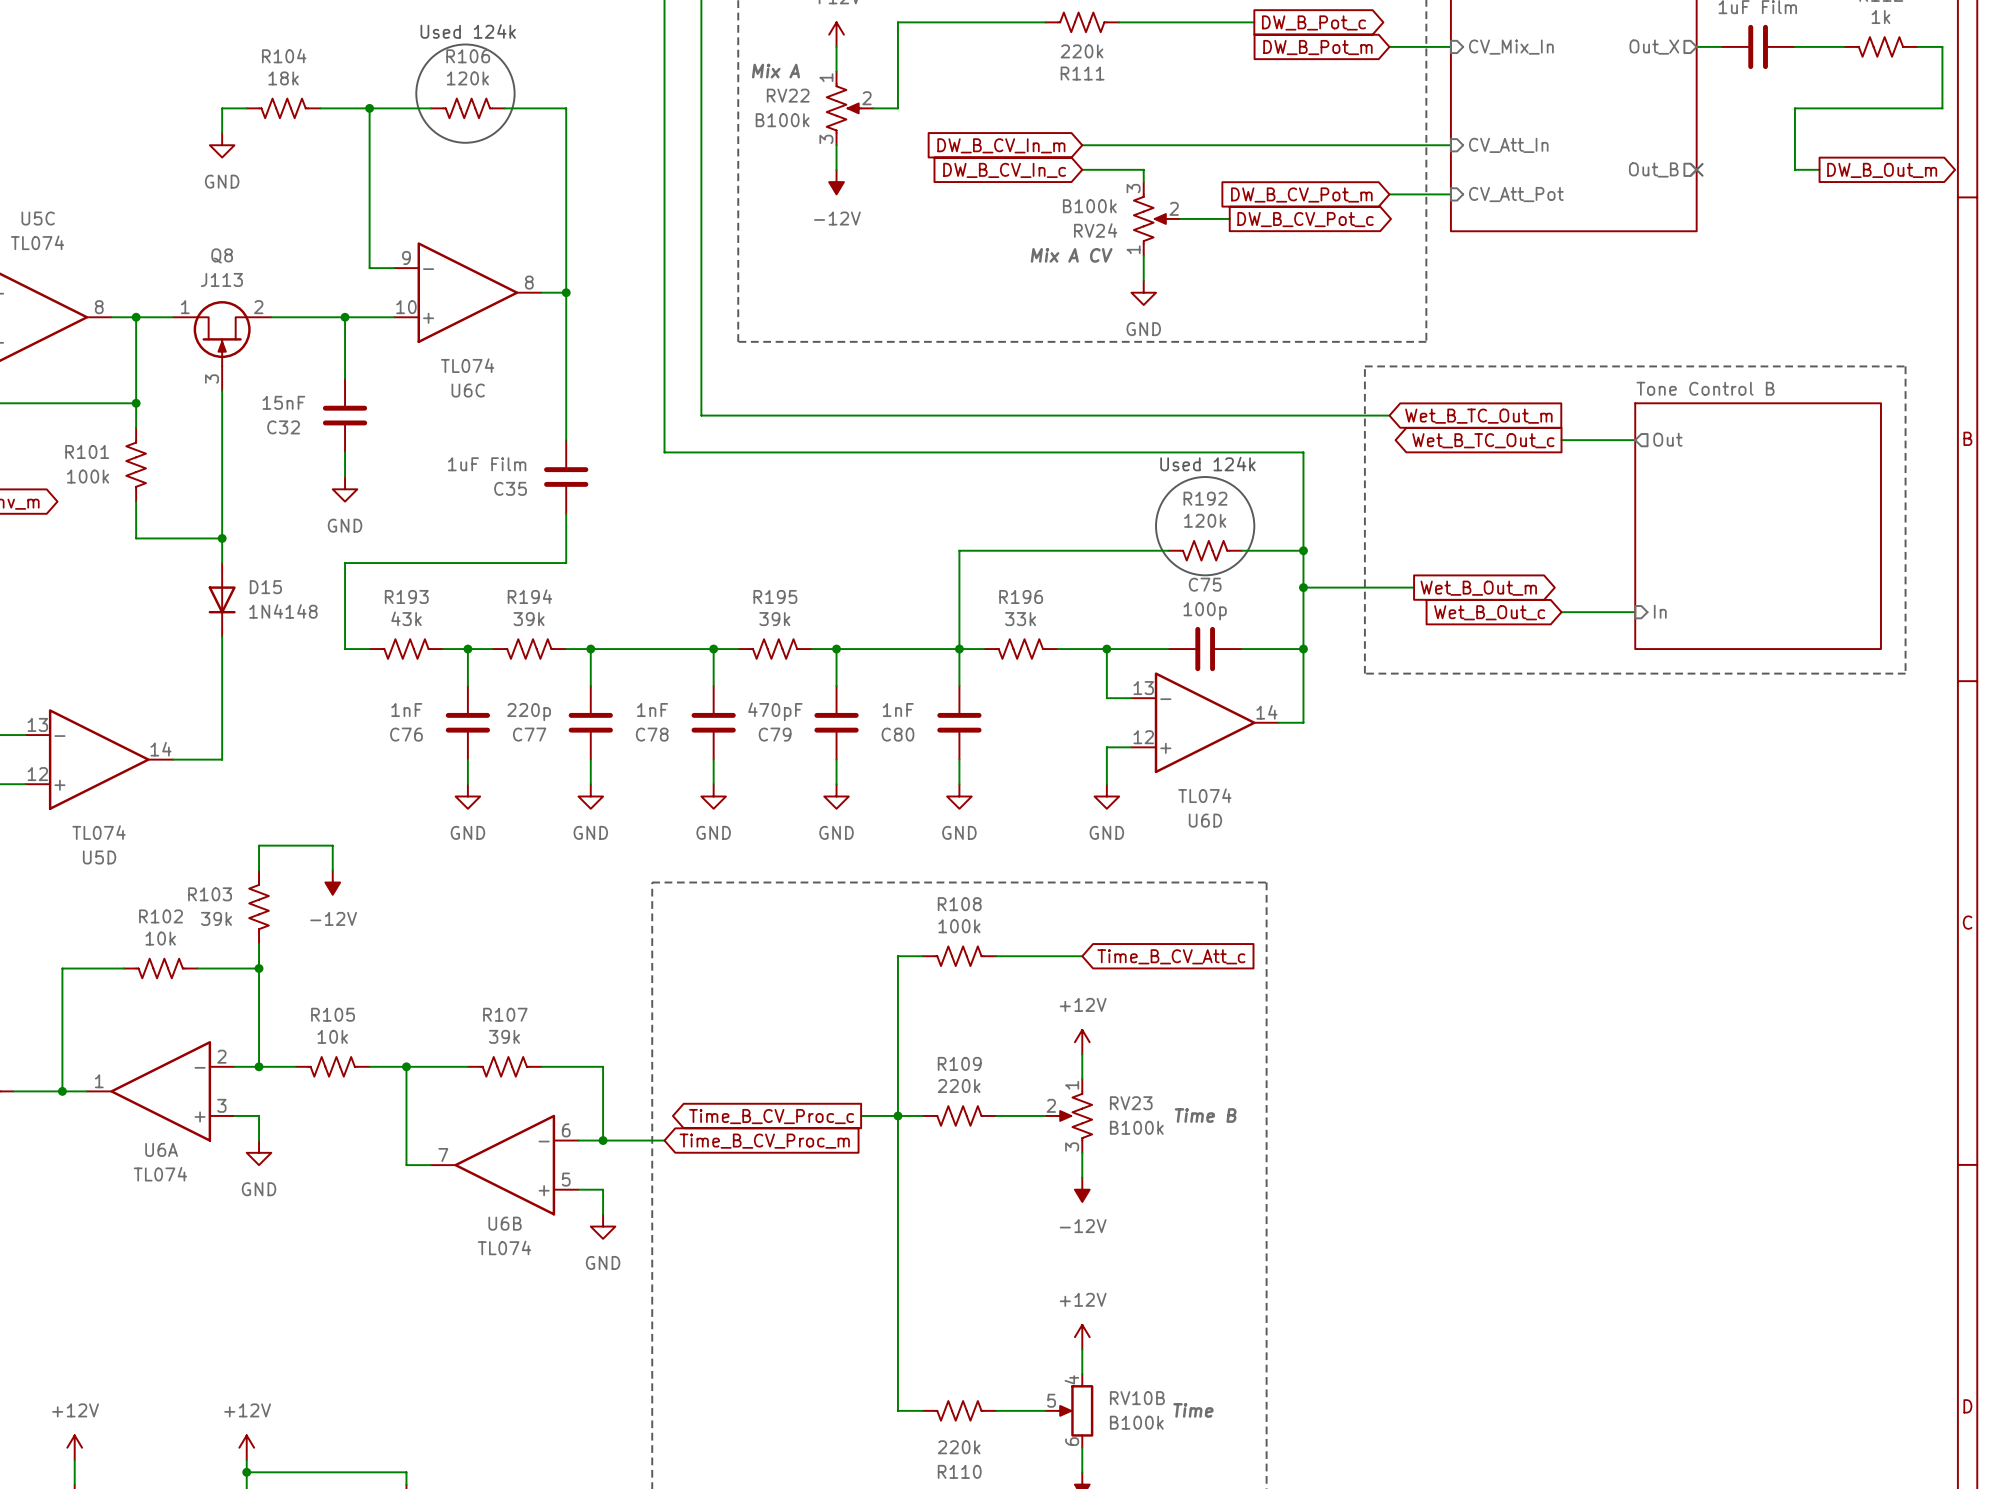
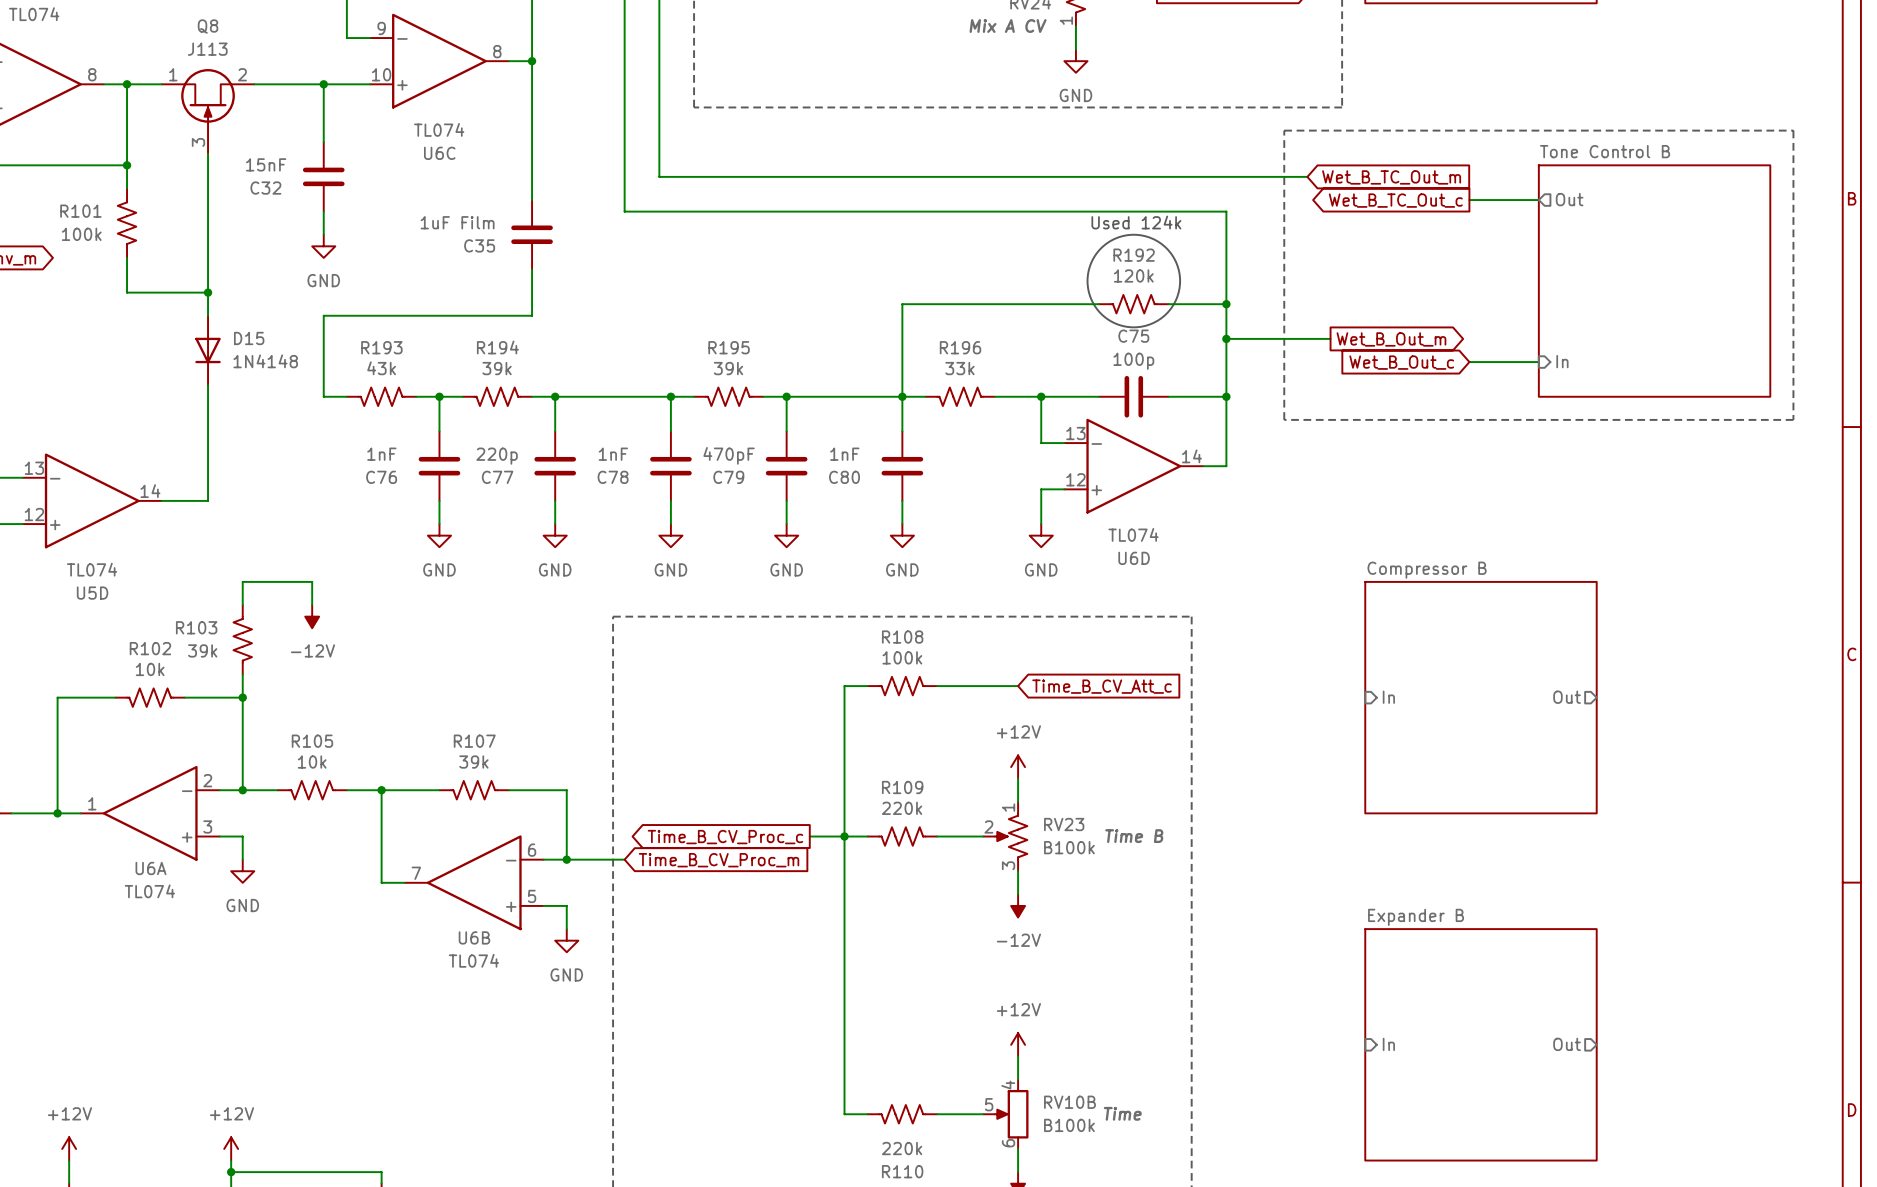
sheet pin: none -> In (1388, 697)
sheet Compressor B: none -> (1480, 697)
sheet pin: none -> Out (1567, 697)
sheet pin: none -> In (1388, 1044)
sheet pin: none -> Out (1567, 1044)
sheet Expander B: none -> (1480, 1044)

